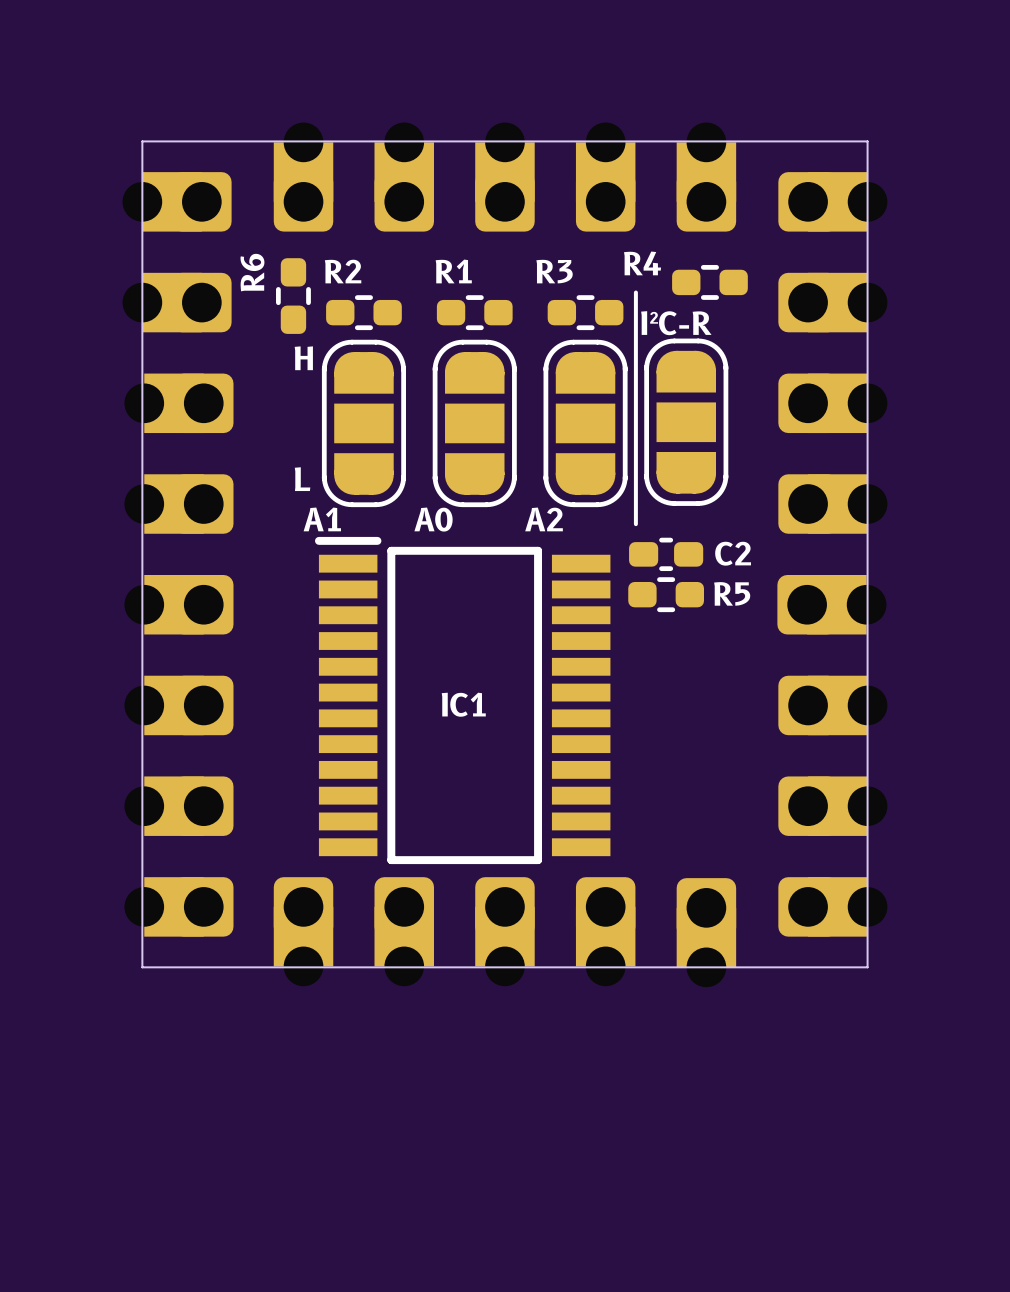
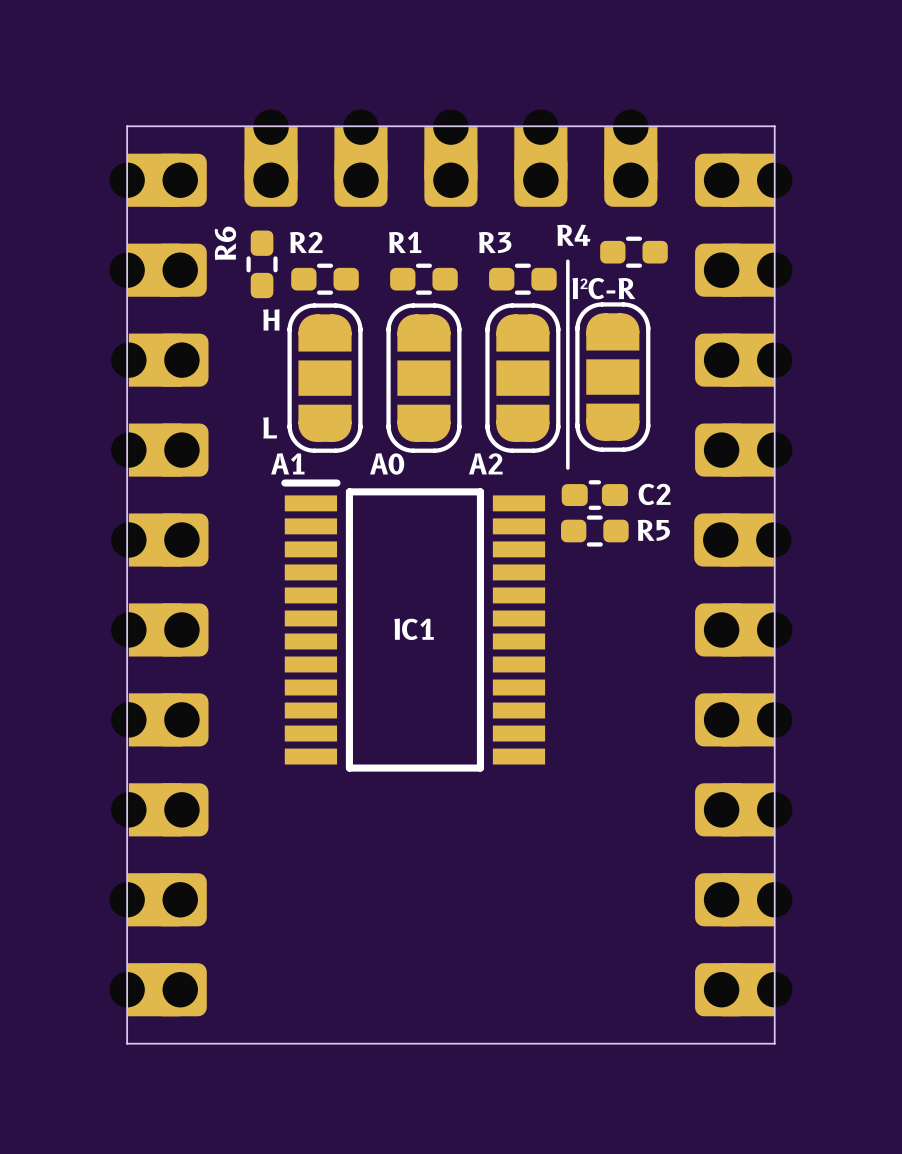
part: (303, 931) -> none
part: (404, 931) -> none
part: (504, 931) -> none
part: (605, 931) -> none
part: (706, 932) -> none
board edge: (142, 967) (867, 967) -> (127, 863) (127, 1043) (774, 1043) (774, 863)
part: none -> (158, 899)
part: none -> (743, 899)
part: none -> (158, 989)
part: none -> (743, 989)

